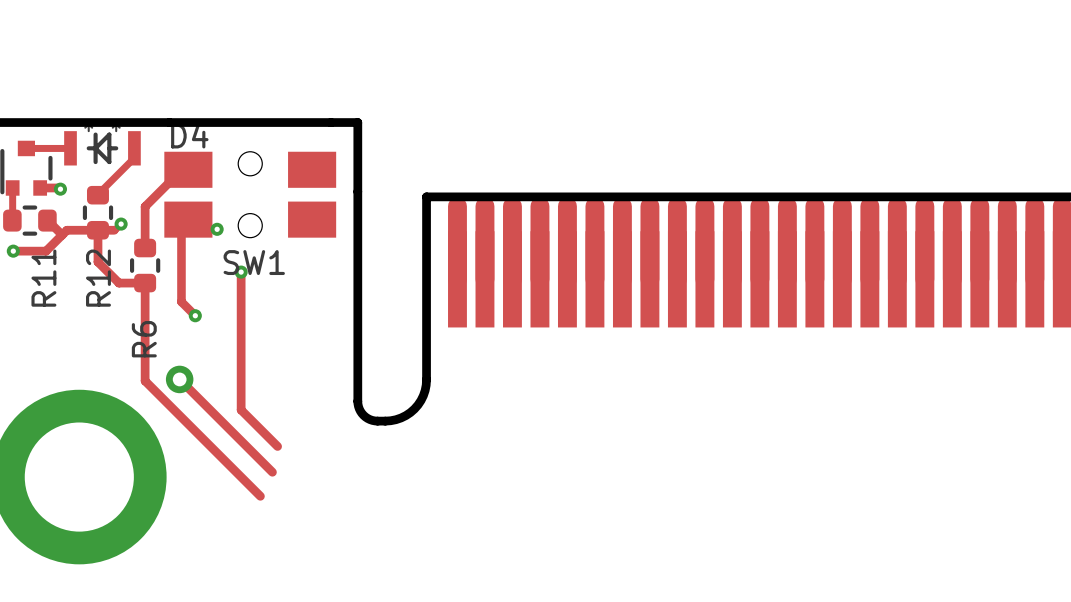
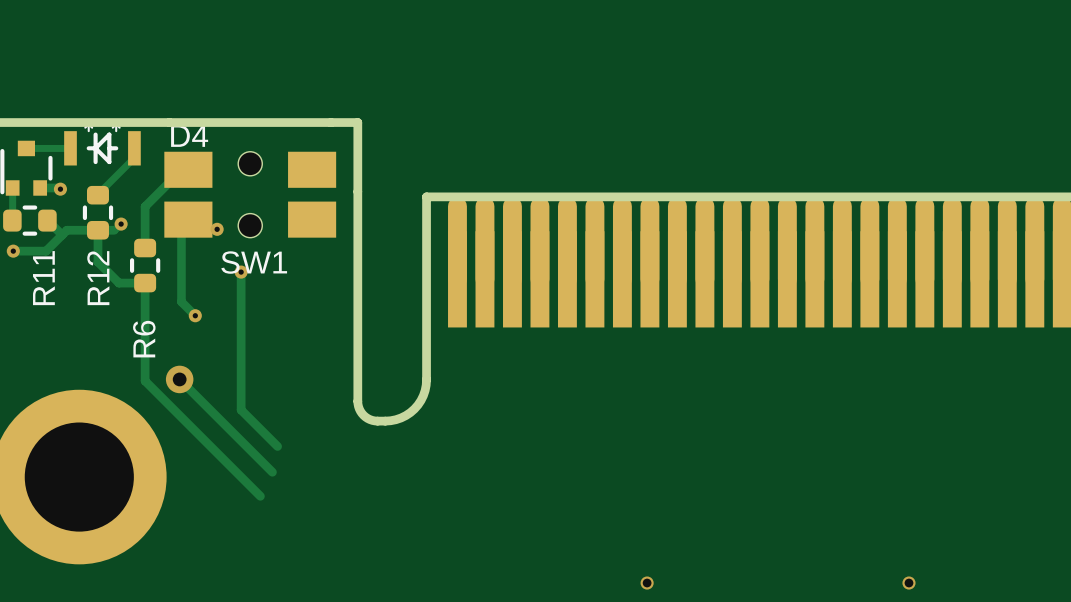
via: none -> (647, 583)
via: none -> (908, 583)

